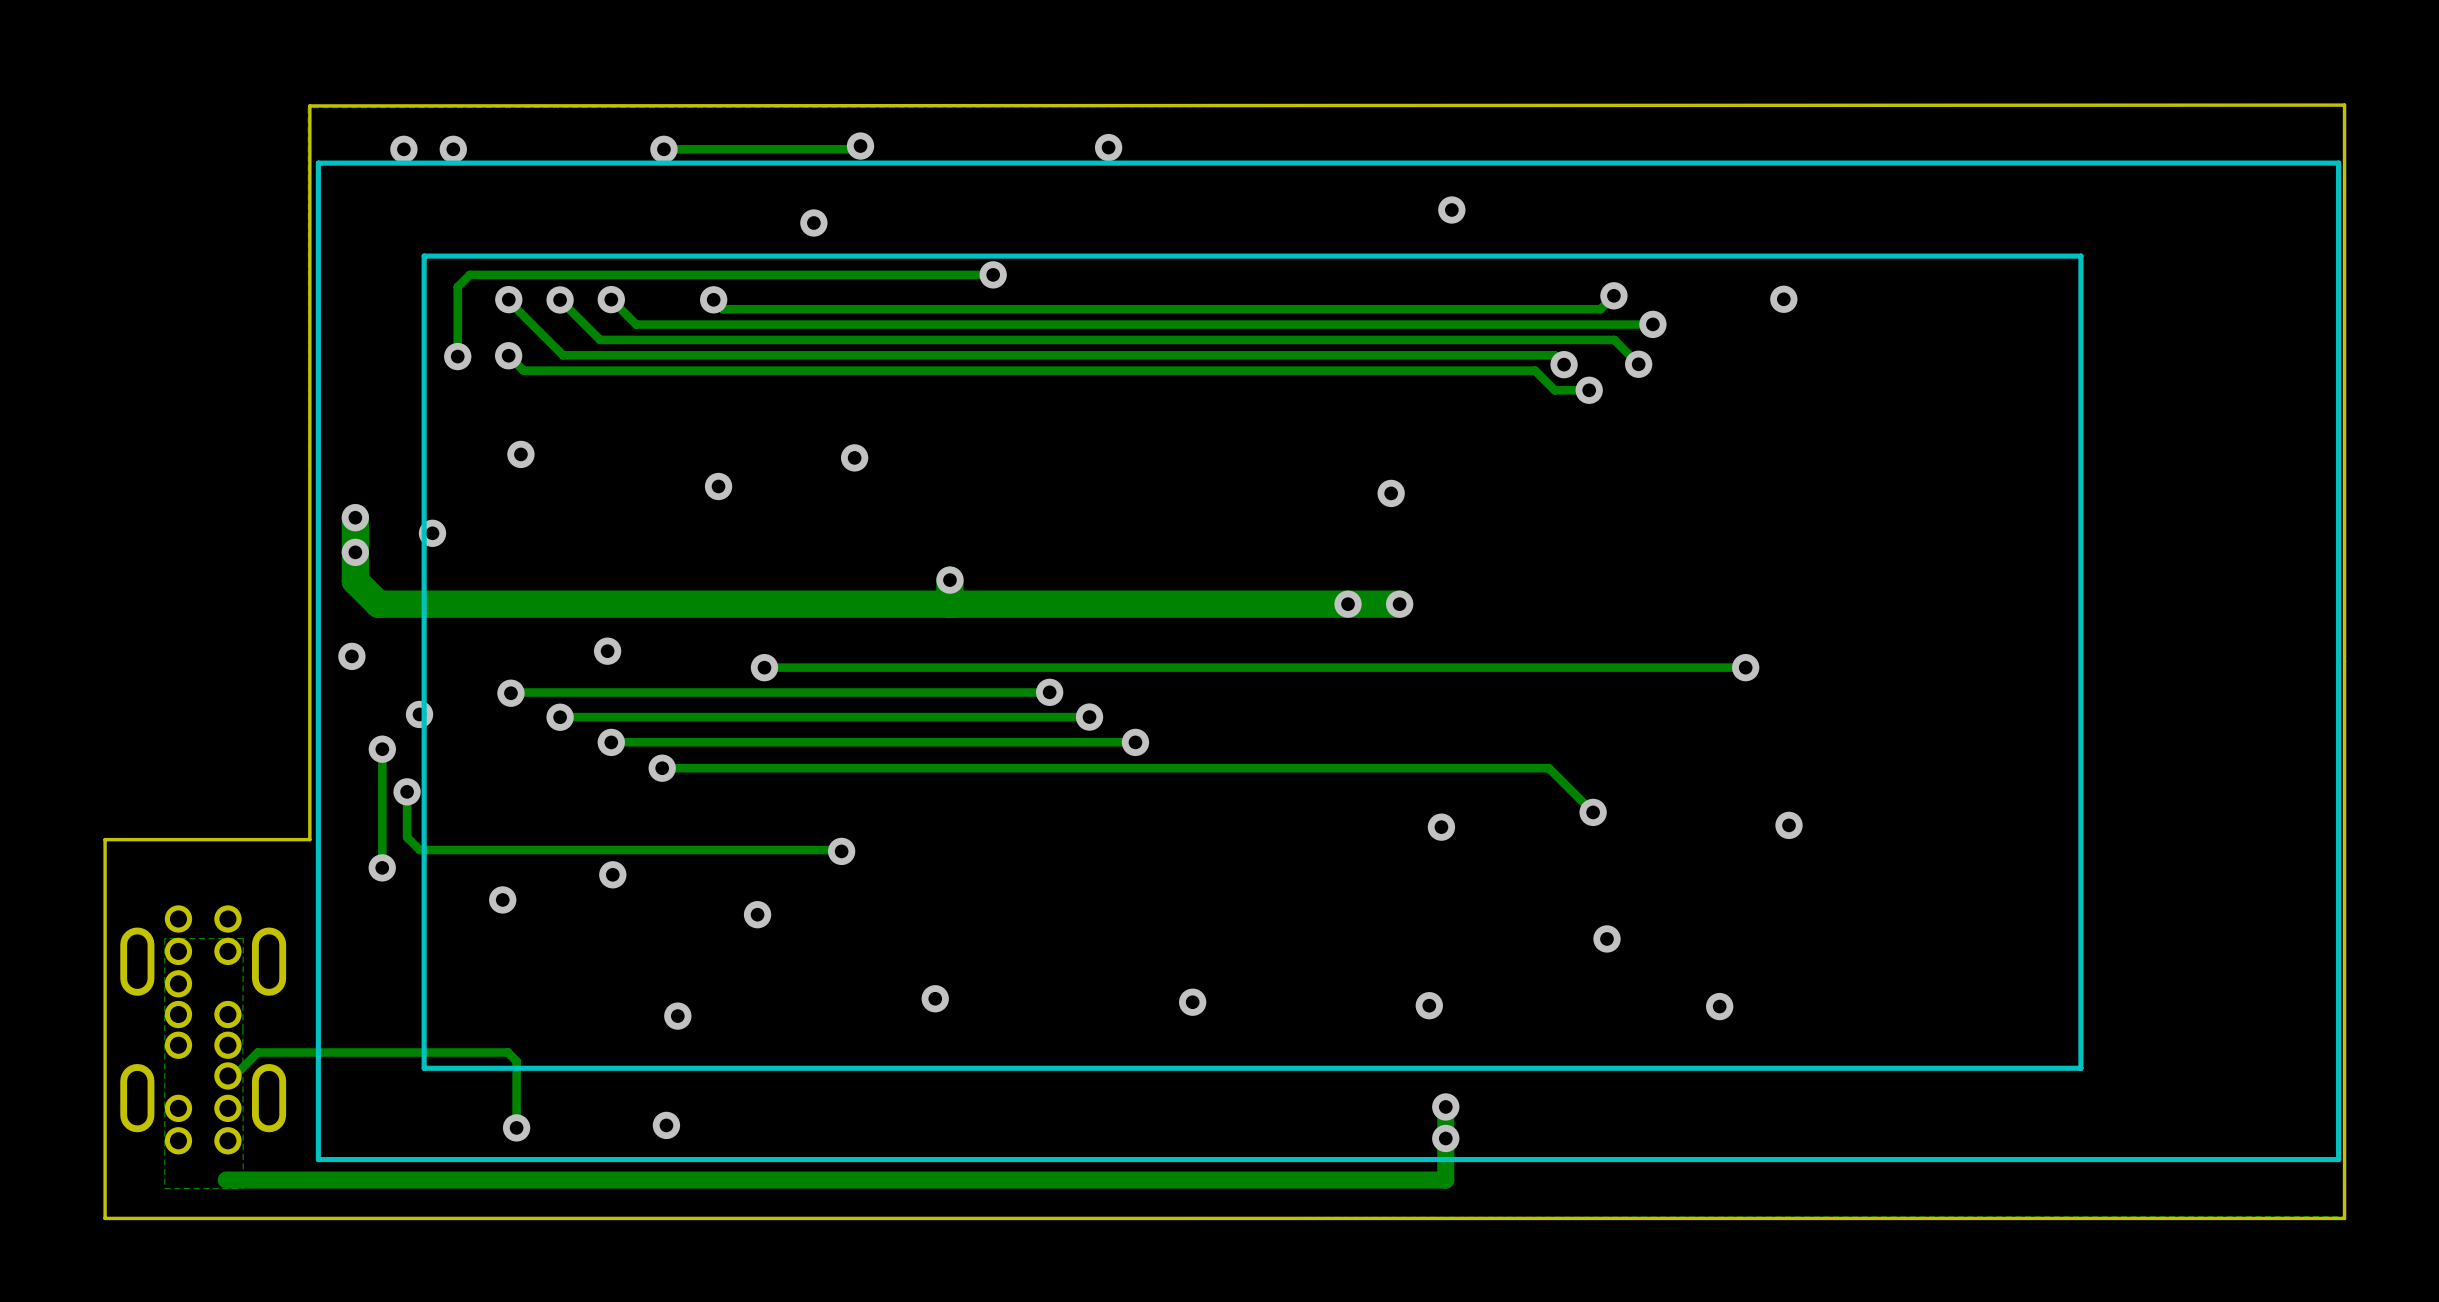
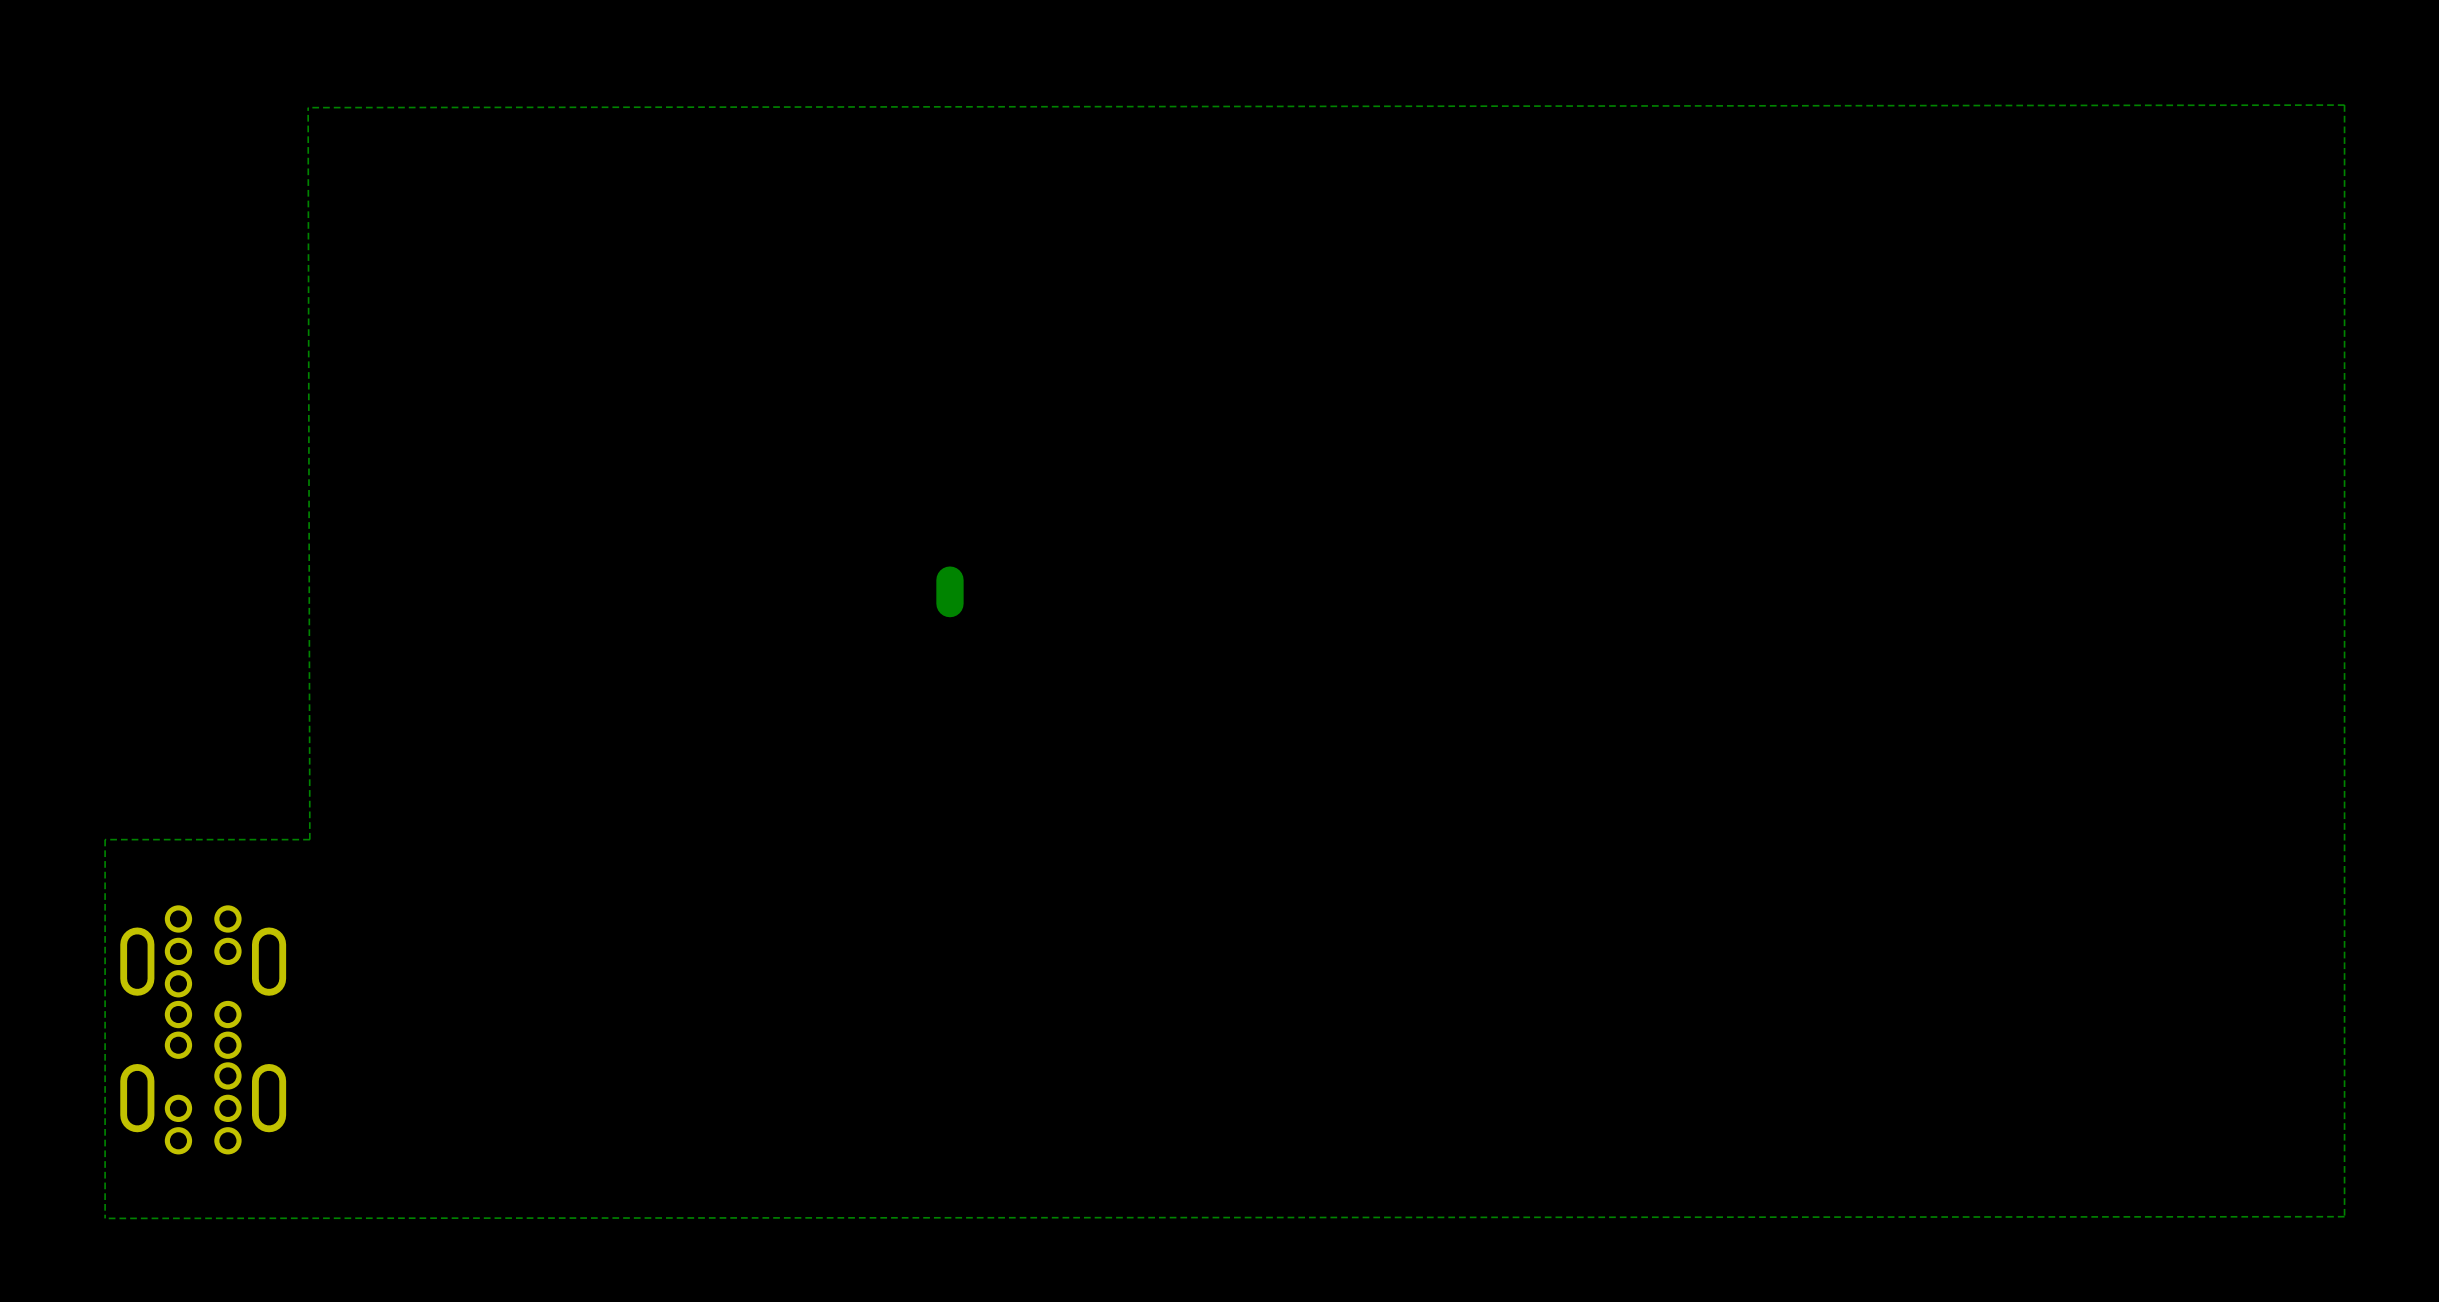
board edge: (2344, 105) (309, 105) (309, 839) (105, 839) (105, 1218) (2344, 1218) (2344, 105) -> none
track: (860, 146) (857, 149) (663, 149) -> none
via: (860, 146) -> none
via: (1108, 147) -> none
via: (403, 149) -> none
via: (453, 149) -> none
via: (663, 149) -> none
line: (2338, 163) (318, 163) (318, 1159) (2338, 1159) (2338, 163) -> none
via: (1451, 209) -> none
via: (813, 223) -> none
line: (2080, 256) (424, 256) (424, 1068) (2080, 1068) (2080, 256) -> none
track: (993, 274) (469, 274) (457, 287) (457, 356) -> none
via: (993, 274) -> none
track: (1613, 295) (1600, 309) (723, 309) (713, 299) -> none
via: (1613, 295) -> none
track: (508, 299) (563, 355) (1554, 355) (1564, 364) -> none
via: (508, 299) -> none
track: (560, 299) (600, 339) (1614, 339) (1638, 364) -> none
via: (560, 299) -> none
track: (611, 299) (636, 324) (1652, 324) -> none
via: (611, 299) -> none
via: (713, 299) -> none
via: (1783, 299) -> none
via: (1652, 324) -> none
track: (508, 355) (523, 370) (1535, 370) (1554, 390) (1589, 390) -> none
via: (508, 355) -> none
via: (457, 356) -> none
via: (1564, 364) -> none
via: (1638, 364) -> none
via: (1589, 390) -> none
via: (520, 454) -> none
via: (854, 457) -> none
via: (718, 486) -> none
via: (1391, 493) -> none
track: (355, 517) (355, 580) (378, 604) (1399, 604) -> none
via: (355, 517) -> none
via: (432, 533) -> none
via: (355, 552) -> none
via: (949, 580) -> none
via: (1348, 604) -> none
via: (1399, 604) -> none
via: (607, 651) -> none
via: (351, 656) -> none
via: (764, 667) -> none
track: (1745, 667) (764, 667) -> none
via: (1745, 667) -> none
track: (1049, 692) (510, 693) -> none
via: (1049, 692) -> none
via: (510, 693) -> none
via: (419, 714) -> none
via: (560, 717) -> none
track: (1089, 717) (560, 717) -> none
via: (1089, 717) -> none
via: (611, 742) -> none
track: (1135, 742) (611, 742) -> none
via: (1135, 742) -> none
track: (382, 749) (382, 867) -> none
via: (382, 749) -> none
track: (662, 768) (1548, 768) (1593, 812) -> none
via: (662, 768) -> none
track: (407, 791) (407, 837) (419, 850) (841, 851) -> none
via: (407, 791) -> none
via: (1593, 812) -> none
via: (1789, 825) -> none
via: (1441, 827) -> none
via: (841, 851) -> none
via: (382, 867) -> none
via: (612, 874) -> none
via: (502, 899) -> none
via: (757, 914) -> none
zone outline: (243, 938) (243, 1188) (164, 1188) (164, 938) (243, 938) -> none
via: (1606, 938) -> none
via: (935, 998) -> none
via: (1192, 1002) -> none
via: (1429, 1005) -> none
via: (1719, 1006) -> none
via: (677, 1016) -> none
track: (227, 1075) (234, 1075) (257, 1052) (507, 1052) (516, 1061) (516, 1127) -> none
track: (1445, 1106) (1445, 1180) (226, 1180) -> none
via: (1445, 1106) -> none
via: (666, 1125) -> none
via: (516, 1127) -> none
via: (1445, 1138) -> none

